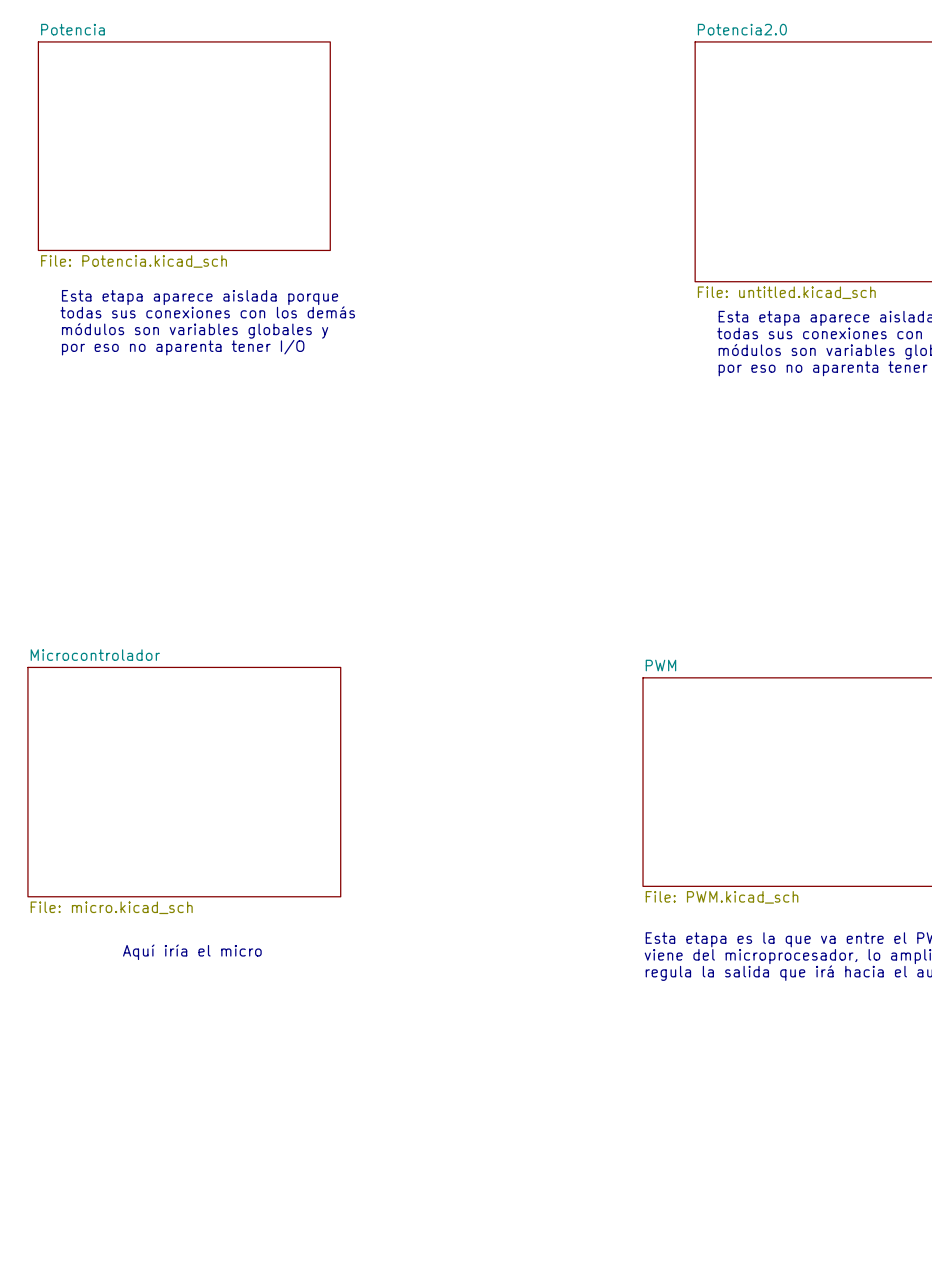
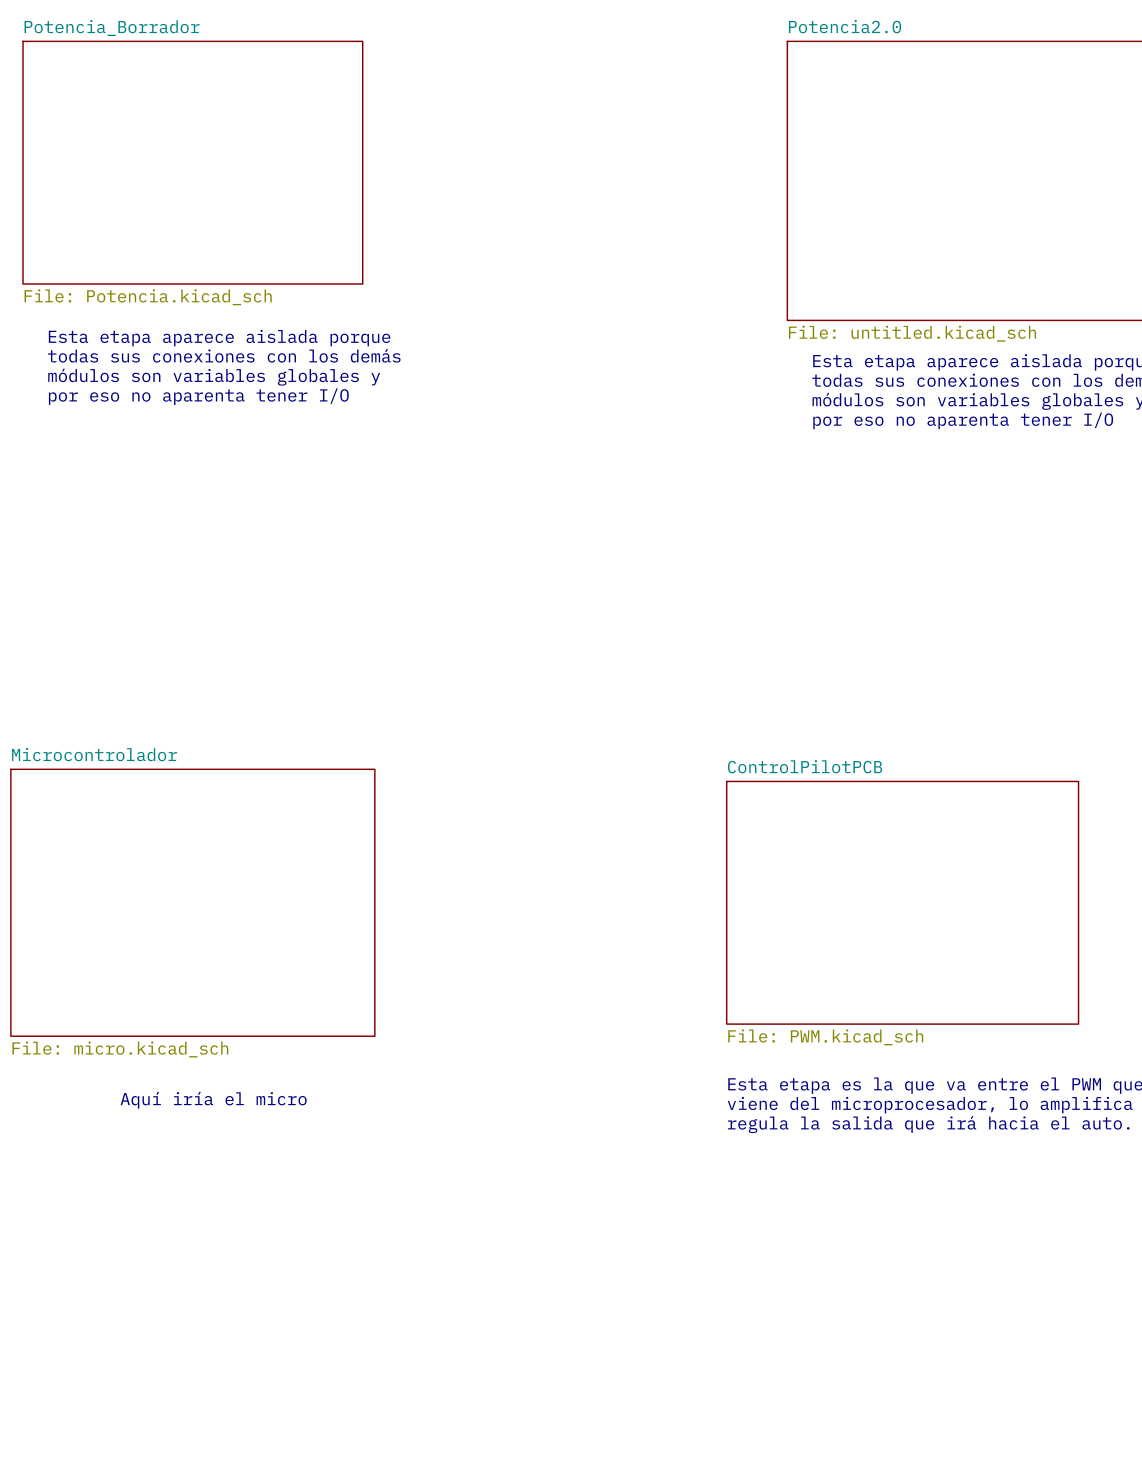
sheet Potencia name: Potencia (72, 29) -> Potencia_Borrador (112, 28)
sheet PWM name: PWM (660, 665) -> ControlPilotPCB (805, 766)

